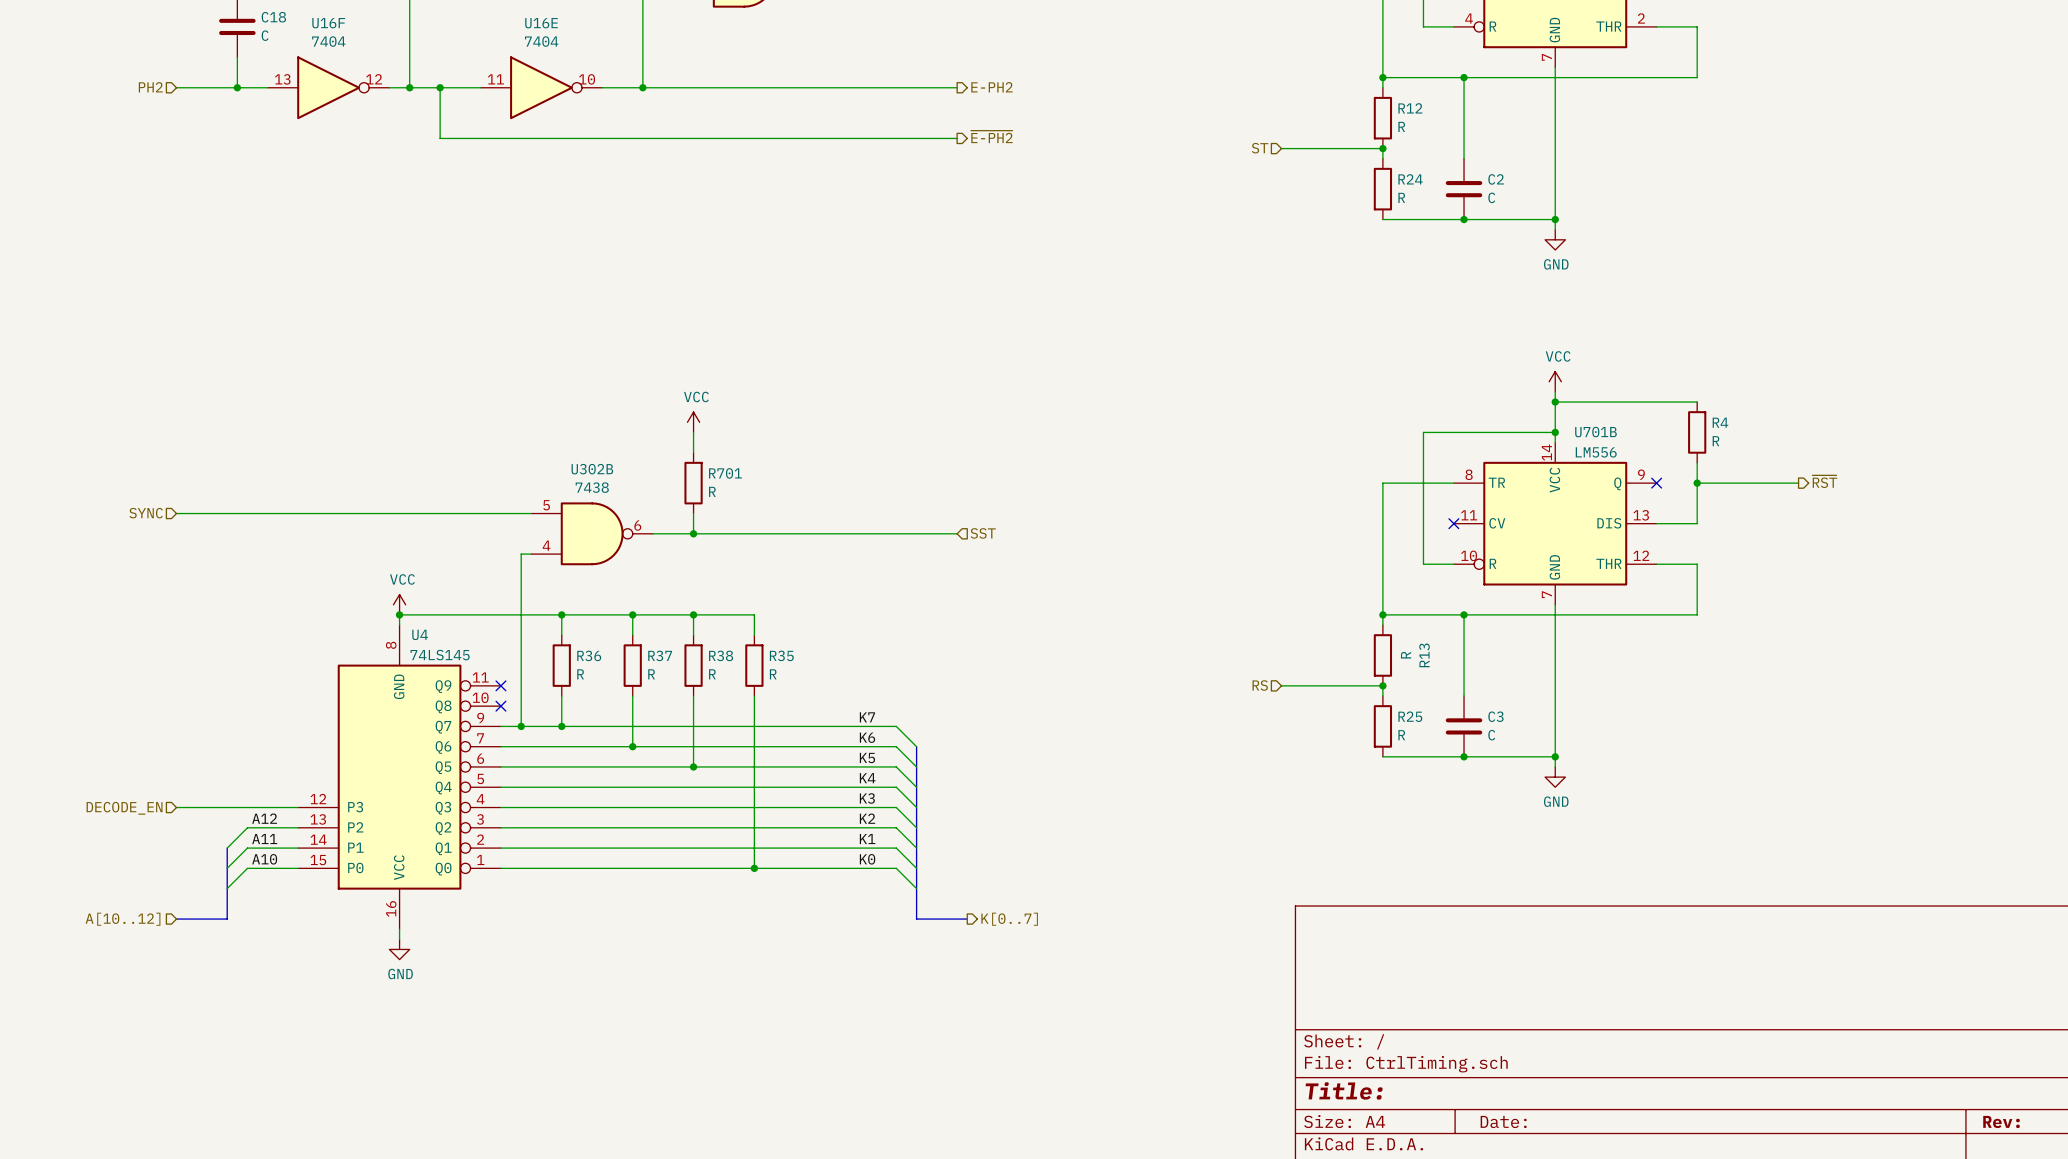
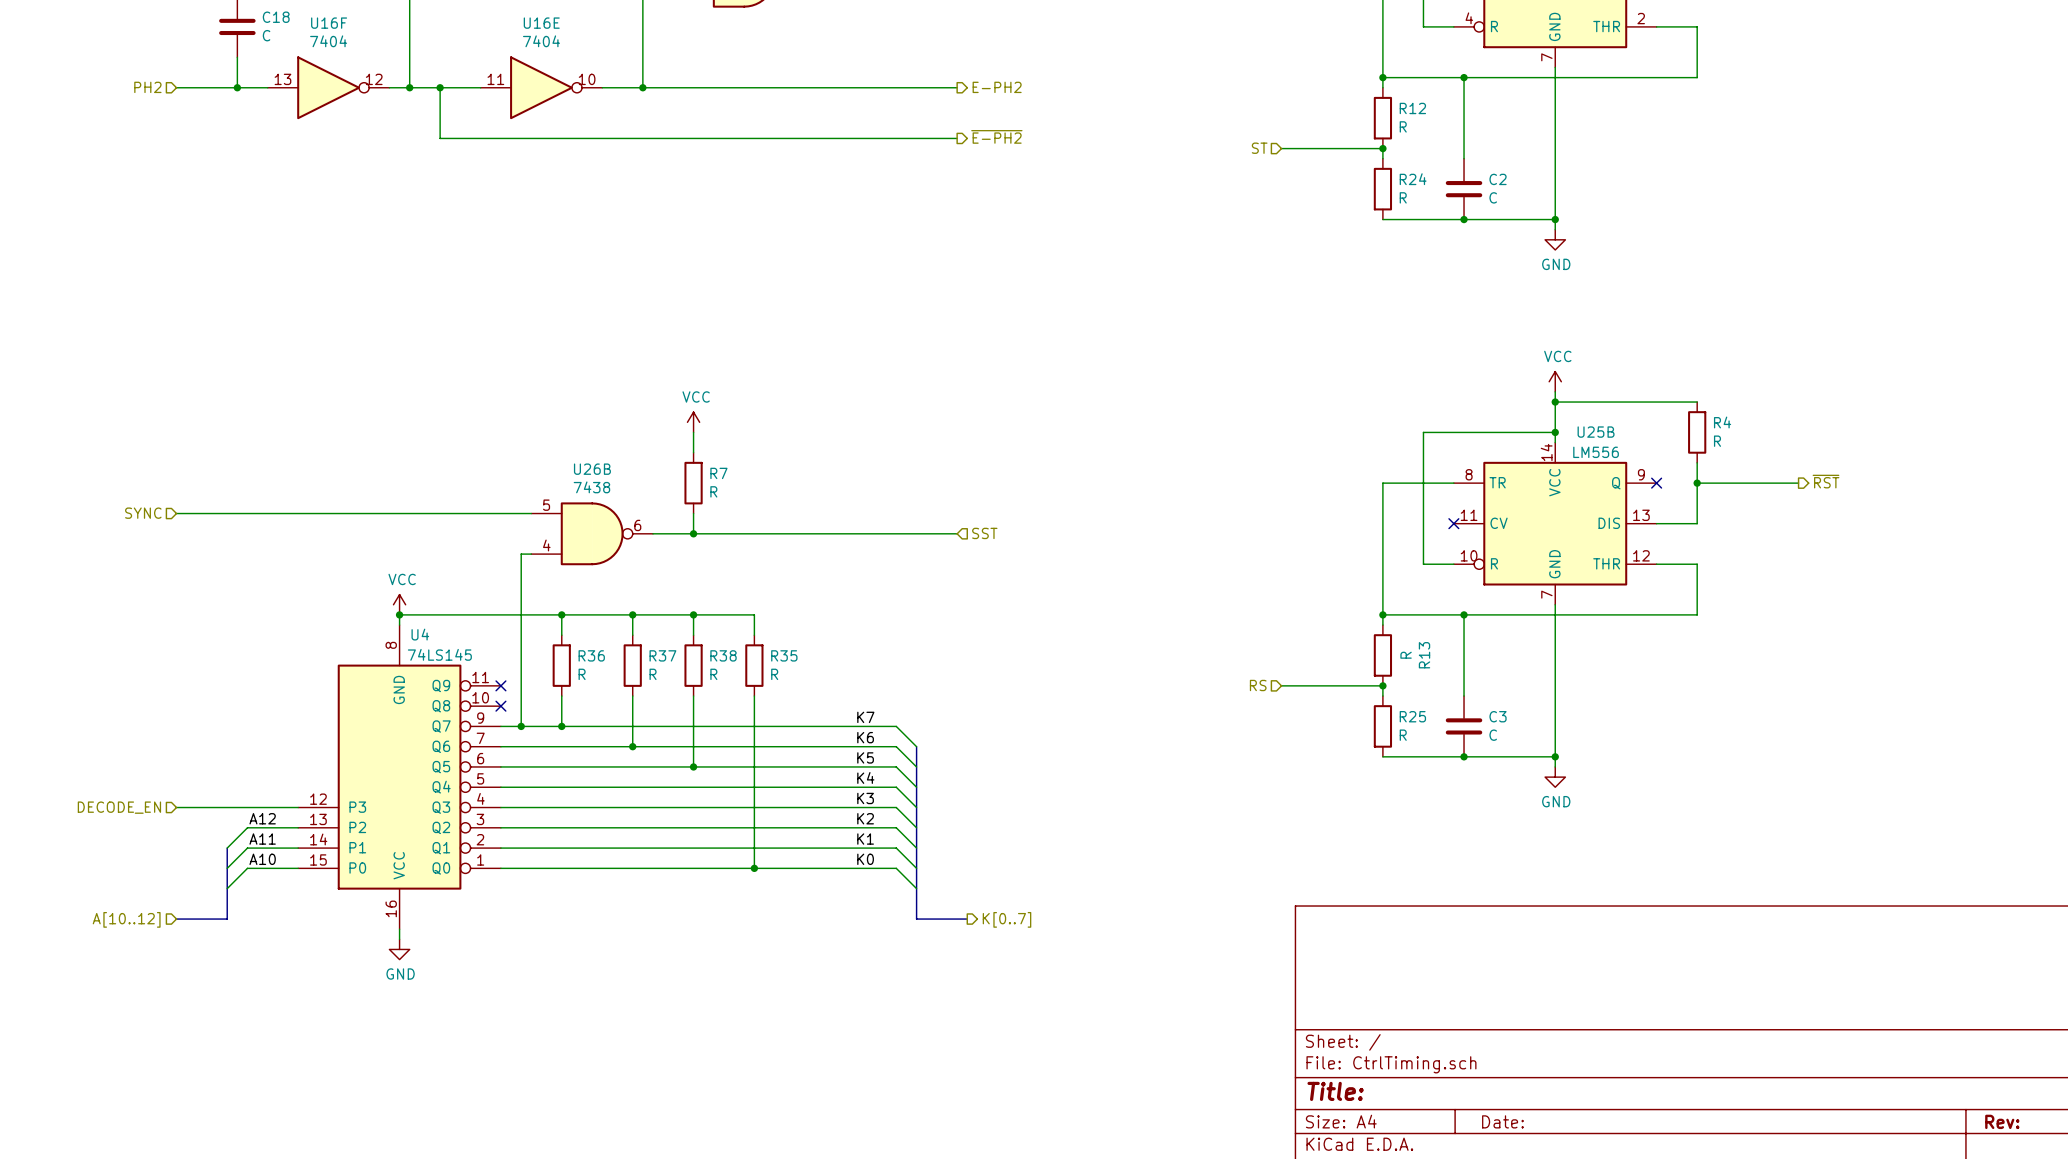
U701B name: U701B (1595, 432) -> U25B (1596, 432)
U302B name: U302B (592, 469) -> U26B (592, 469)
R701 name: R701 (725, 473) -> R7 (718, 473)

